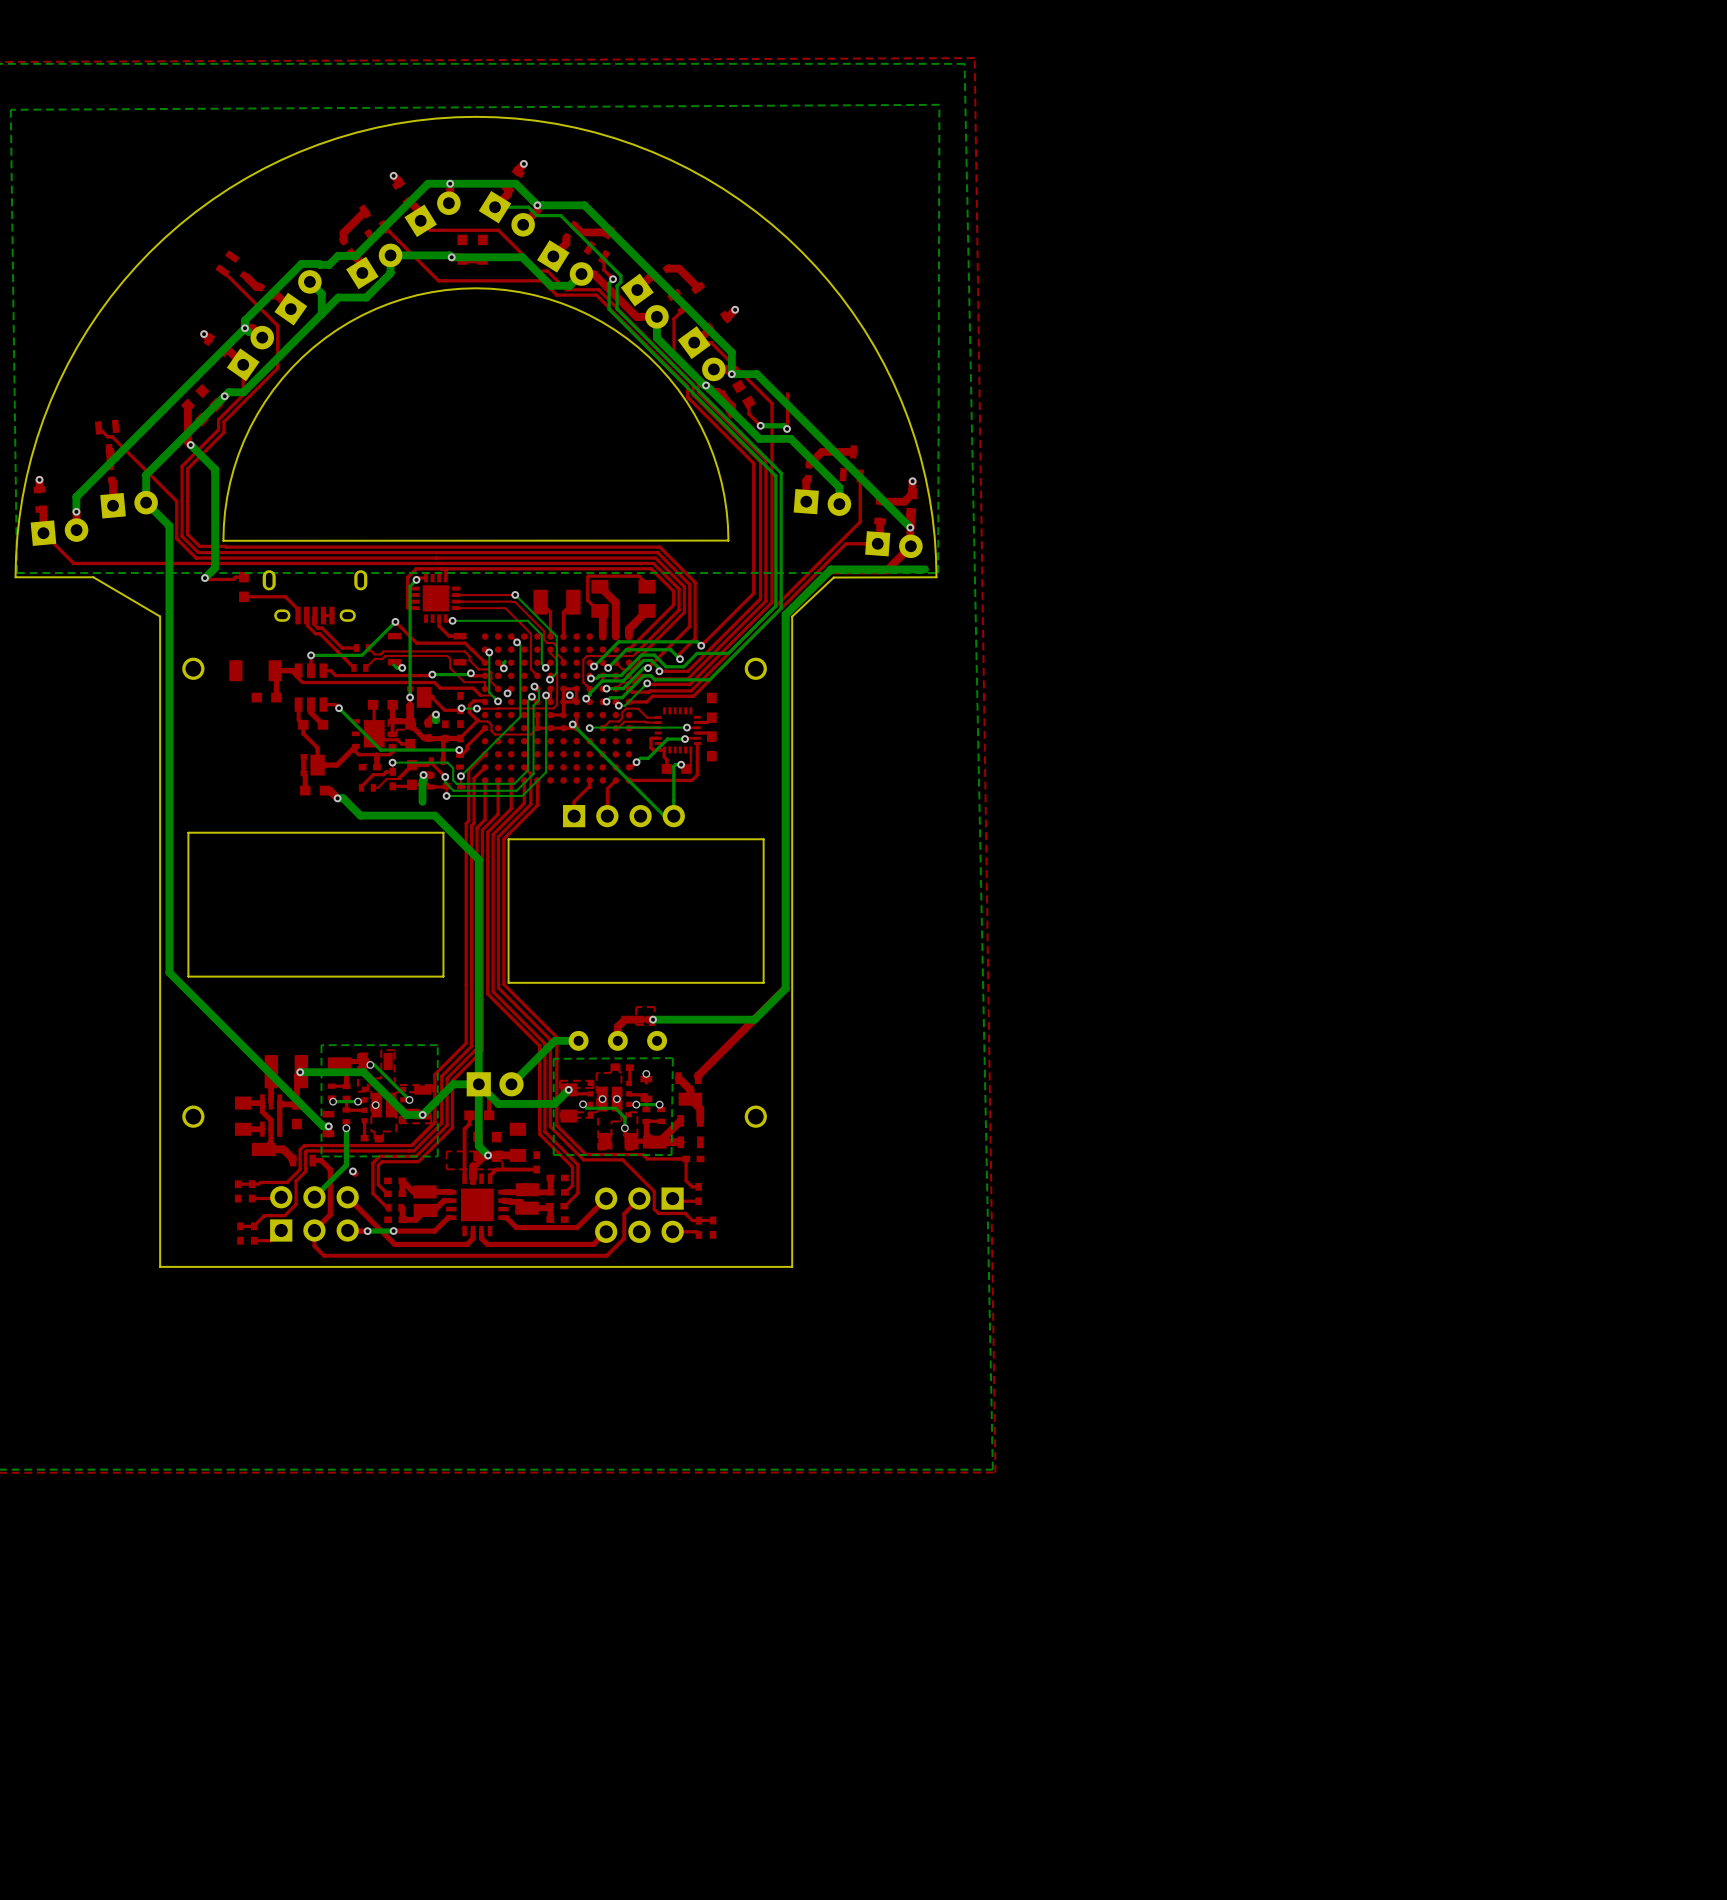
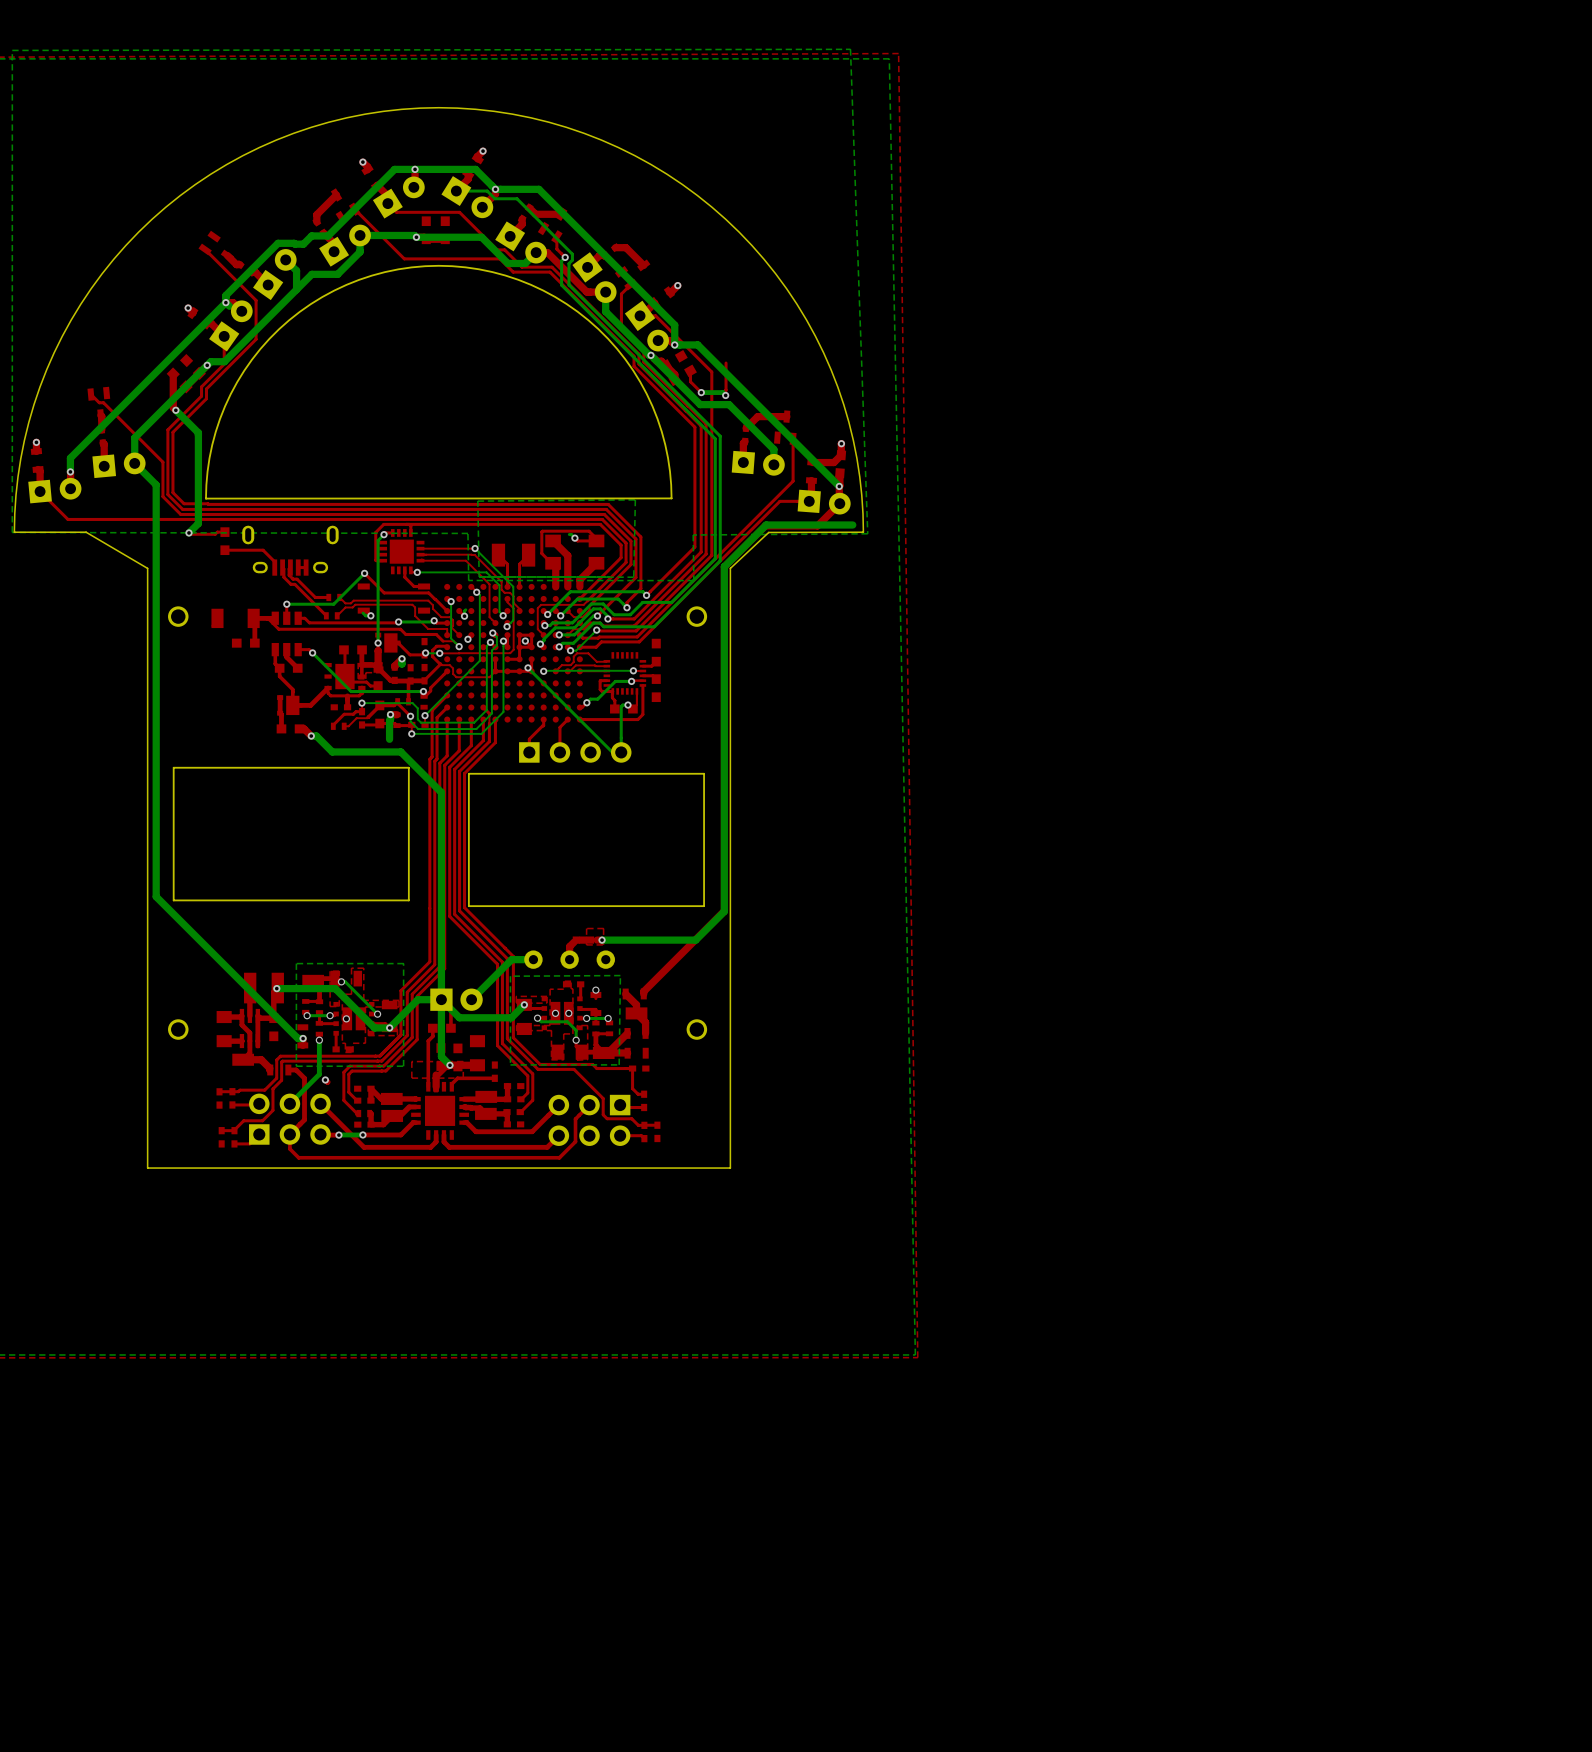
bottom zone outline: (939, 104) (10, 109) (17, 572) (938, 572) (939, 104) -> (850, 49) (867, 533) (693, 535) (693, 580) (468, 580) (467, 533) (12, 532) (12, 50) (850, 49)
bottom track: none -> (569, 534) (574, 538)
top track: none -> (574, 538) (577, 540) (596, 540)
via: none -> (574, 538)
bottom zone outline: none -> (479, 576) (609, 577)
bottom zone outline: none -> (479, 576) (477, 501) (635, 499) (633, 577) (479, 576)

